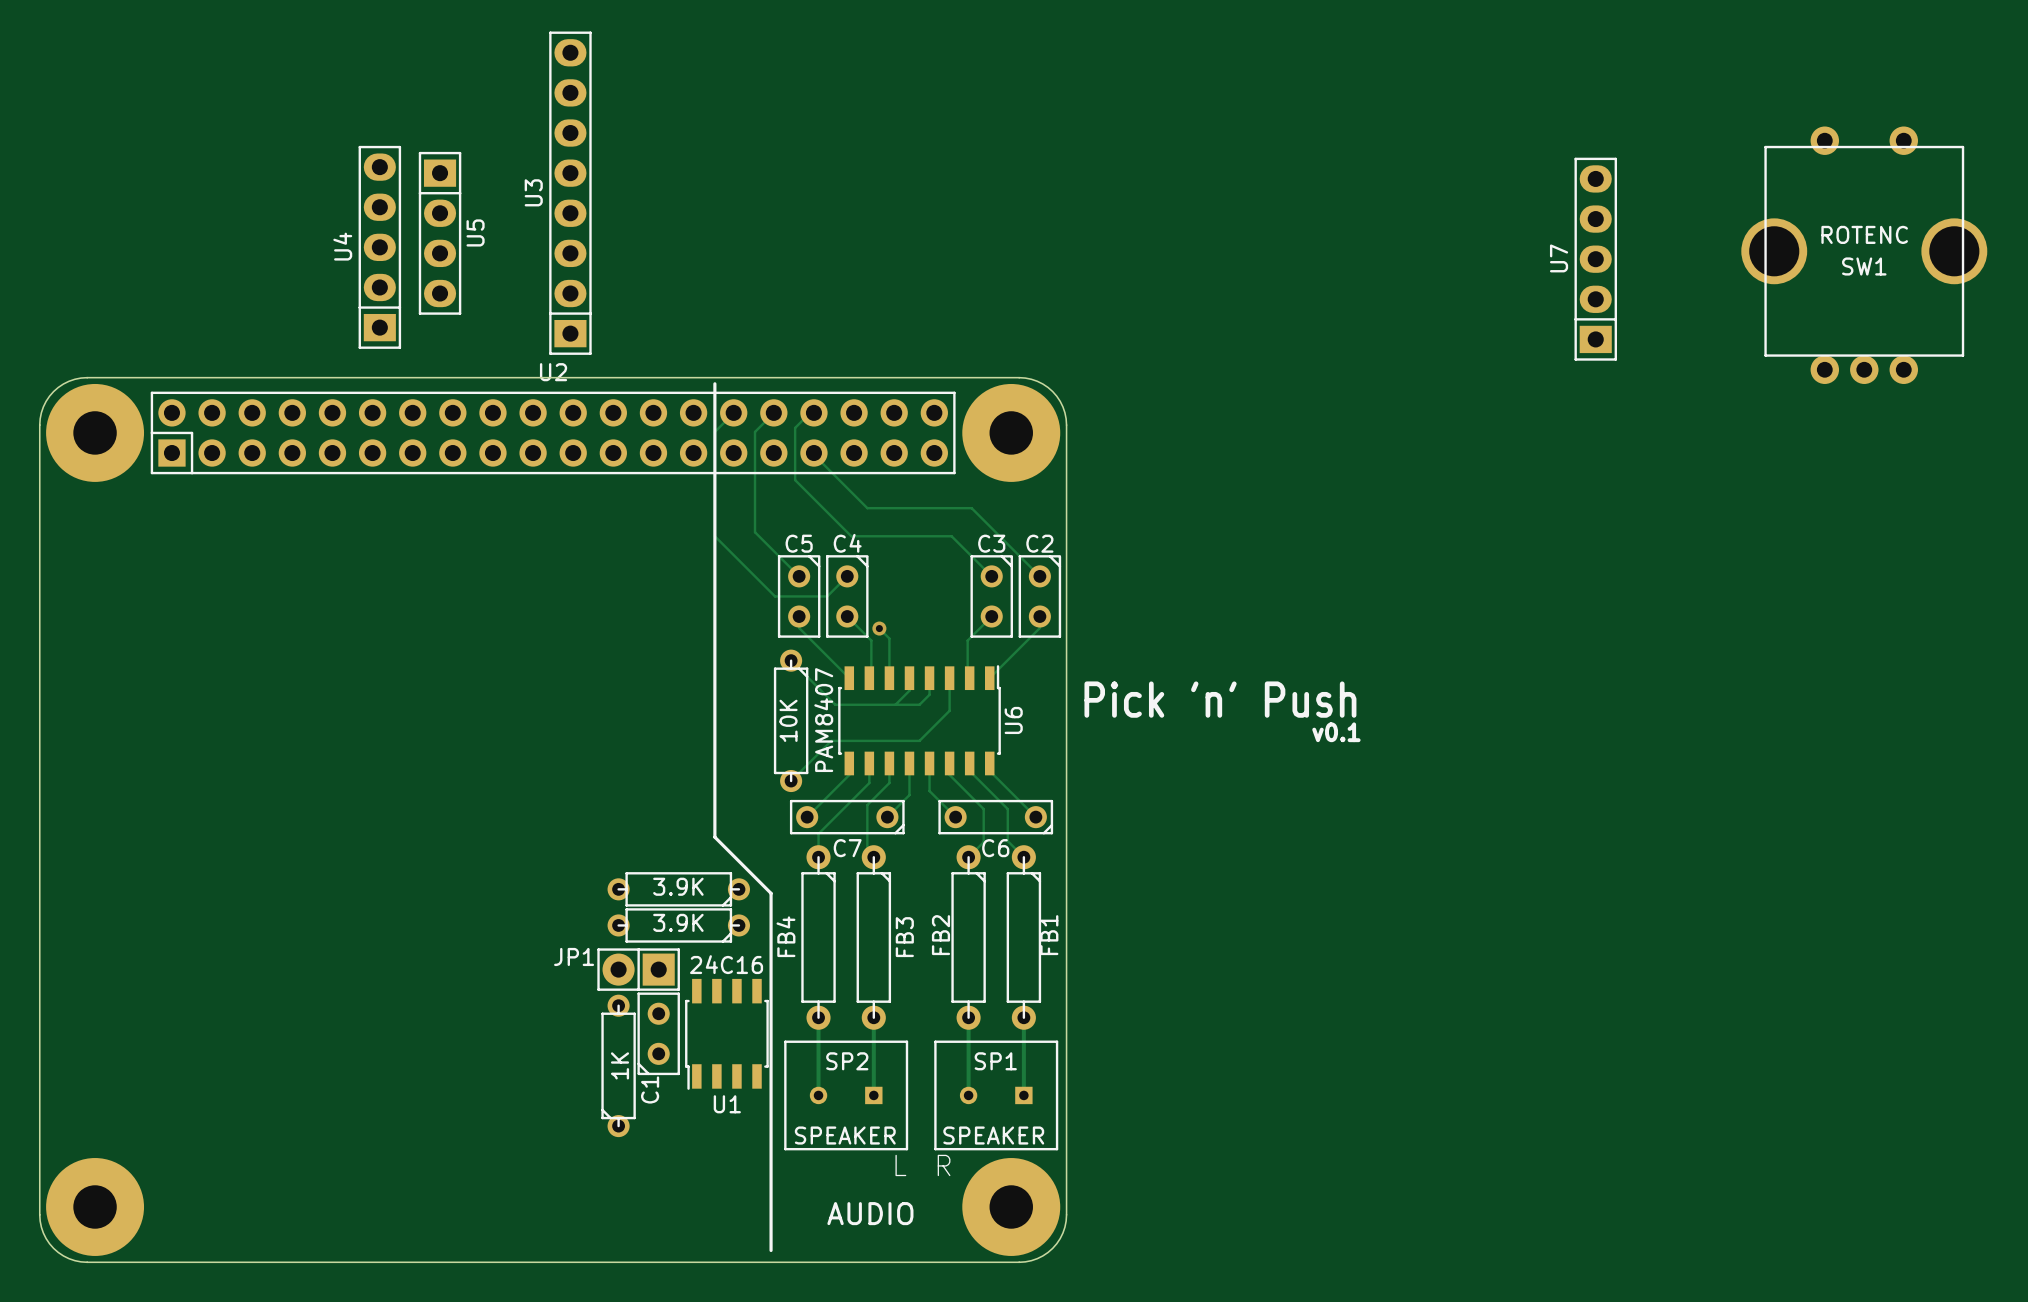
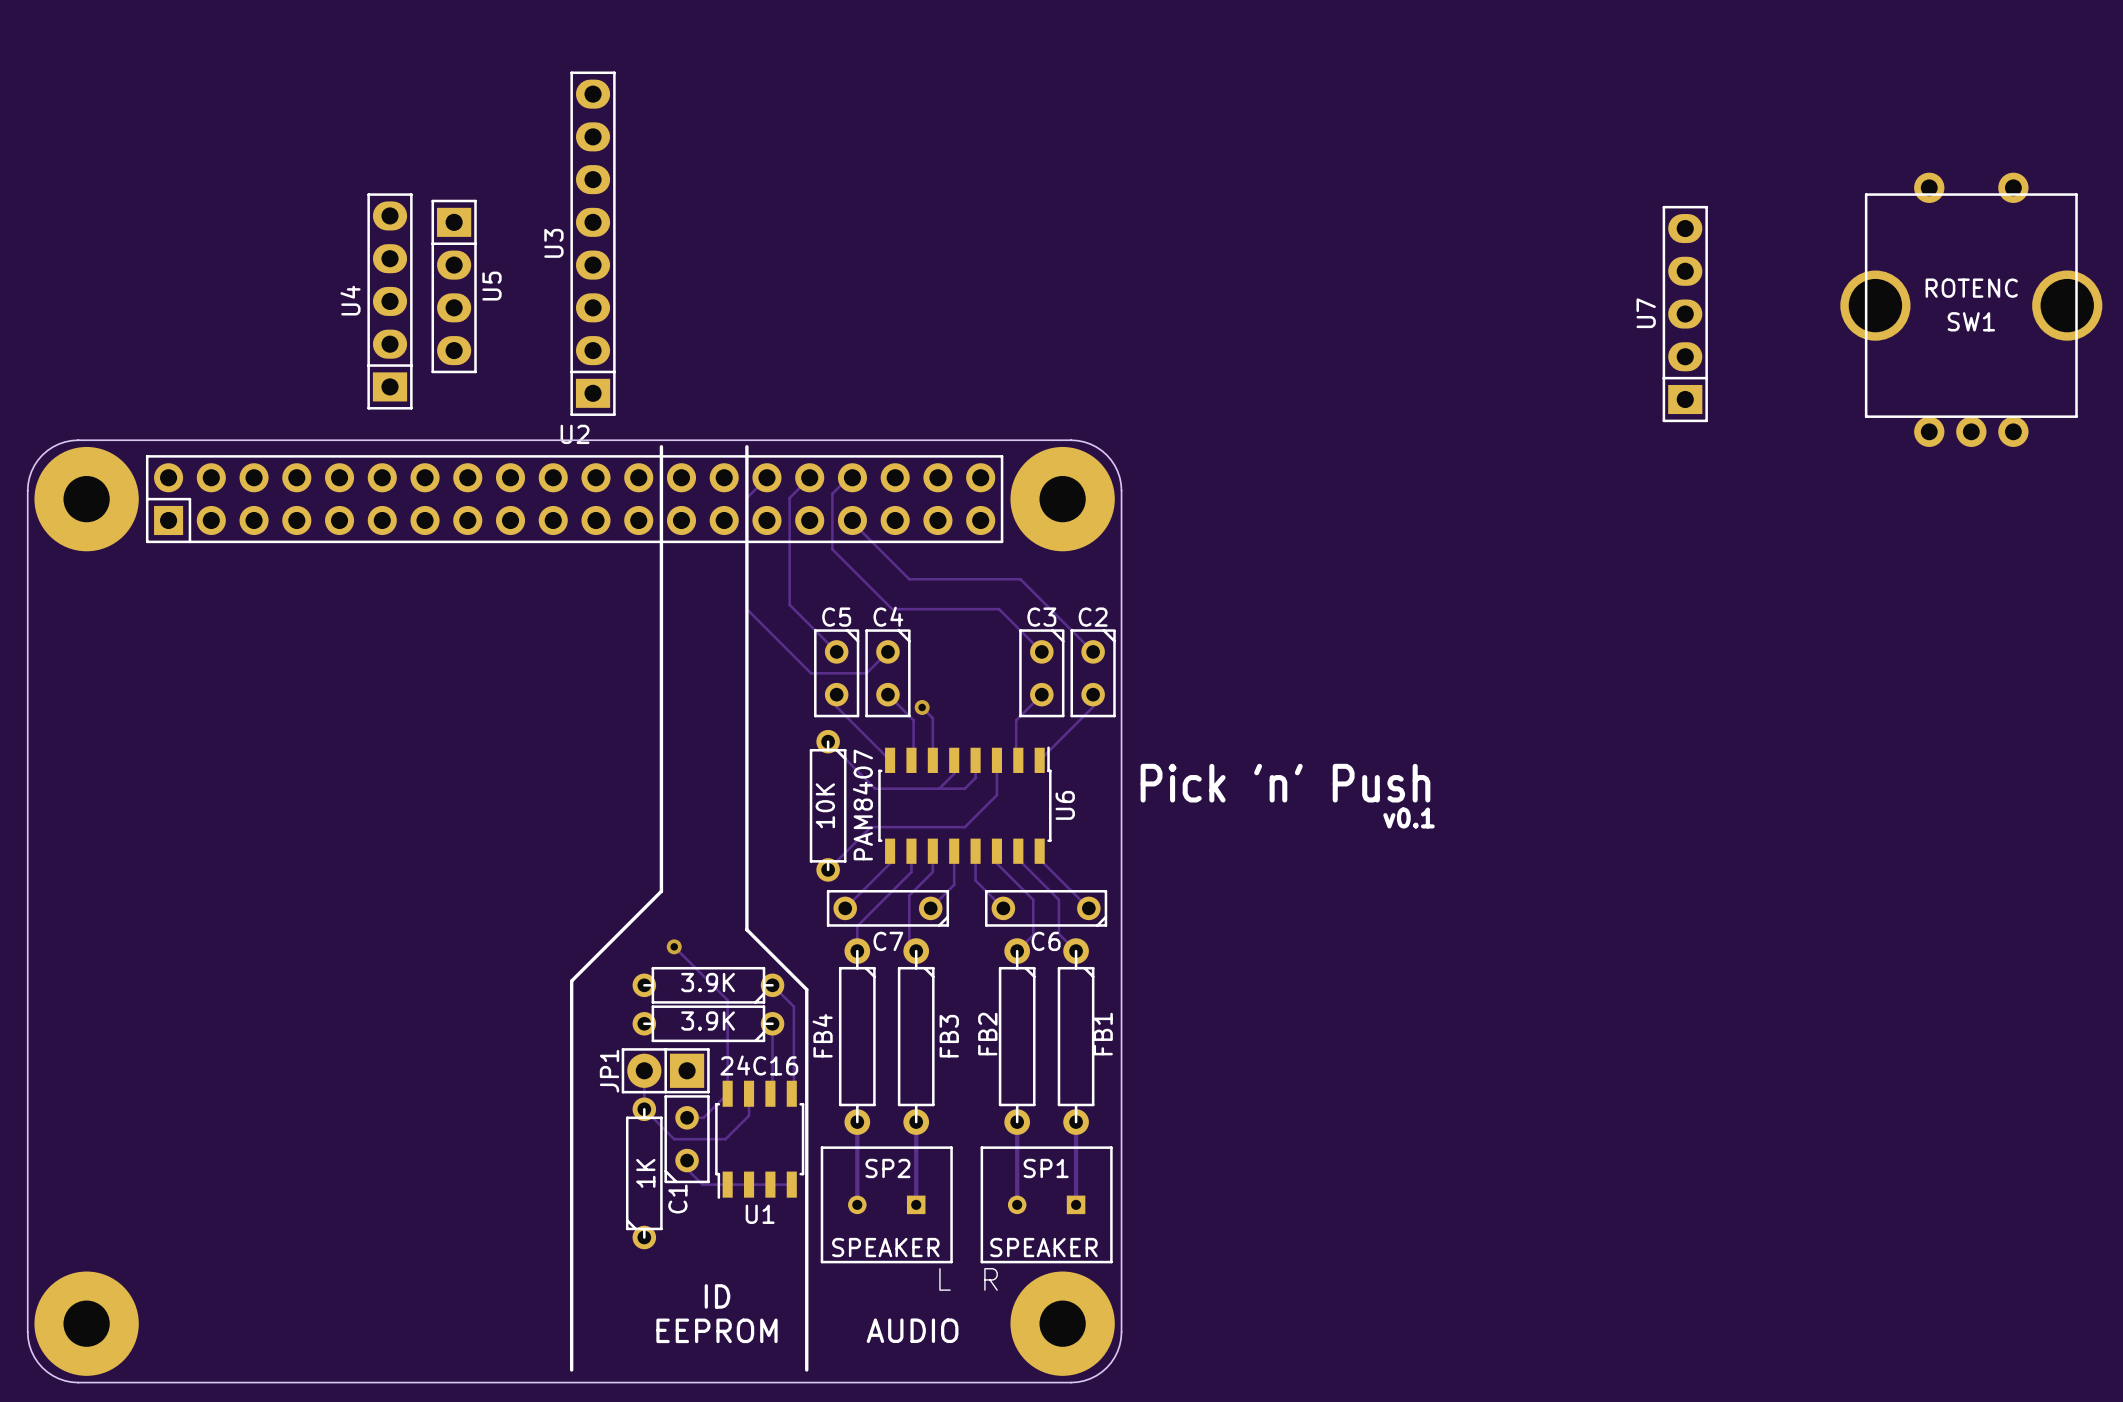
line: none -> (661, 446) (661, 891) (571, 981) (571, 1369)
track: none -> (674, 946) (727, 1000) (727, 1093) (703, 1117) (687, 1117)
via: none -> (674, 946)
track: none -> (772, 985) (793, 1006) (793, 1091) (791, 1093)
track: none -> (772, 1023) (772, 1091) (770, 1093)
JP1 name rotation: 0° (574, 956) -> 90° counterclockwise (609, 1071)
track: none -> (644, 1070) (644, 1109) (674, 1139) (725, 1139) (749, 1115) (749, 1093)
track: none -> (687, 1160) (687, 1169) (702, 1184) (791, 1184)
text: none -> ID (717, 1296)
text: none -> EEPROM (716, 1330)

